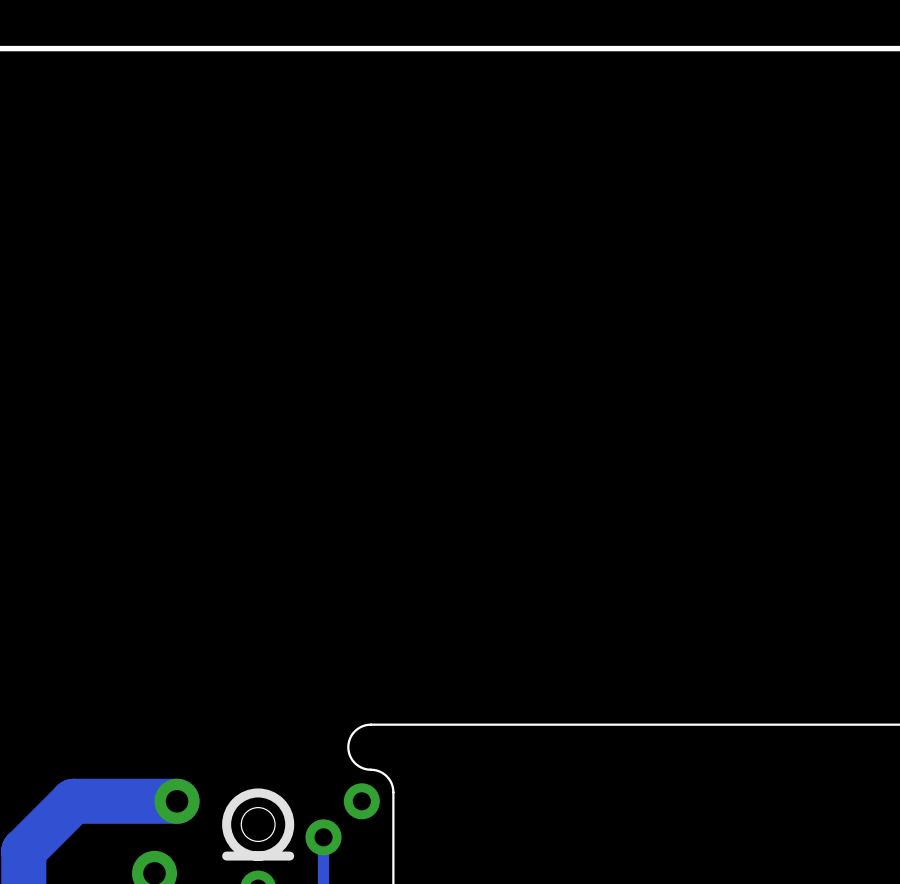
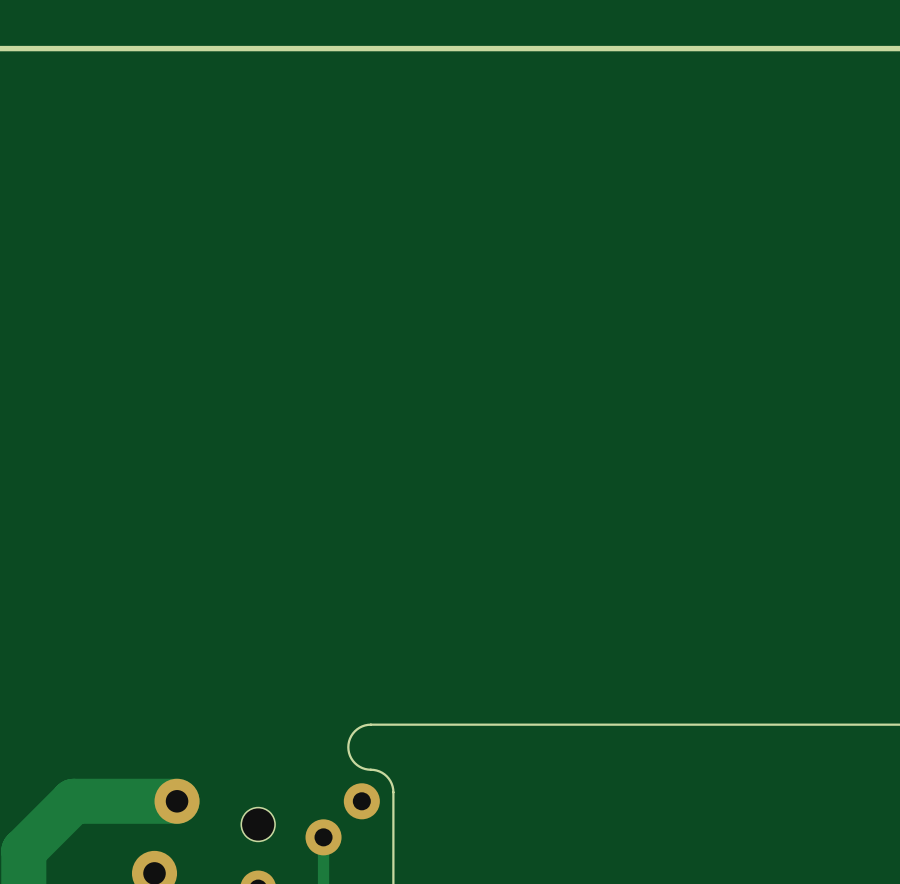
part footprint: [222, 788, 295, 861] -> [241, 807, 276, 842]

